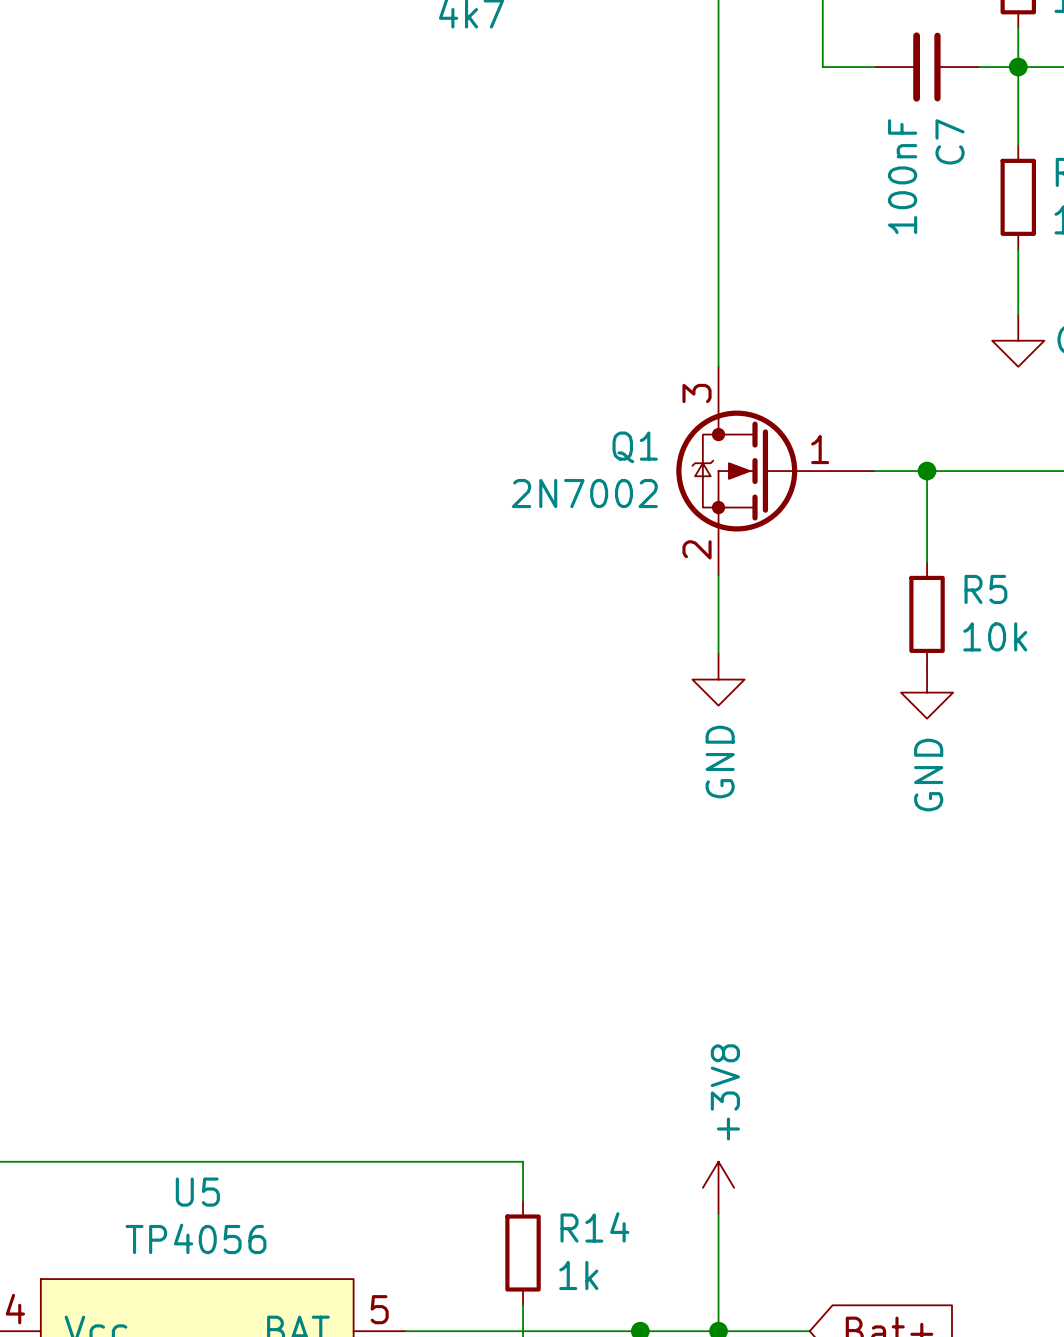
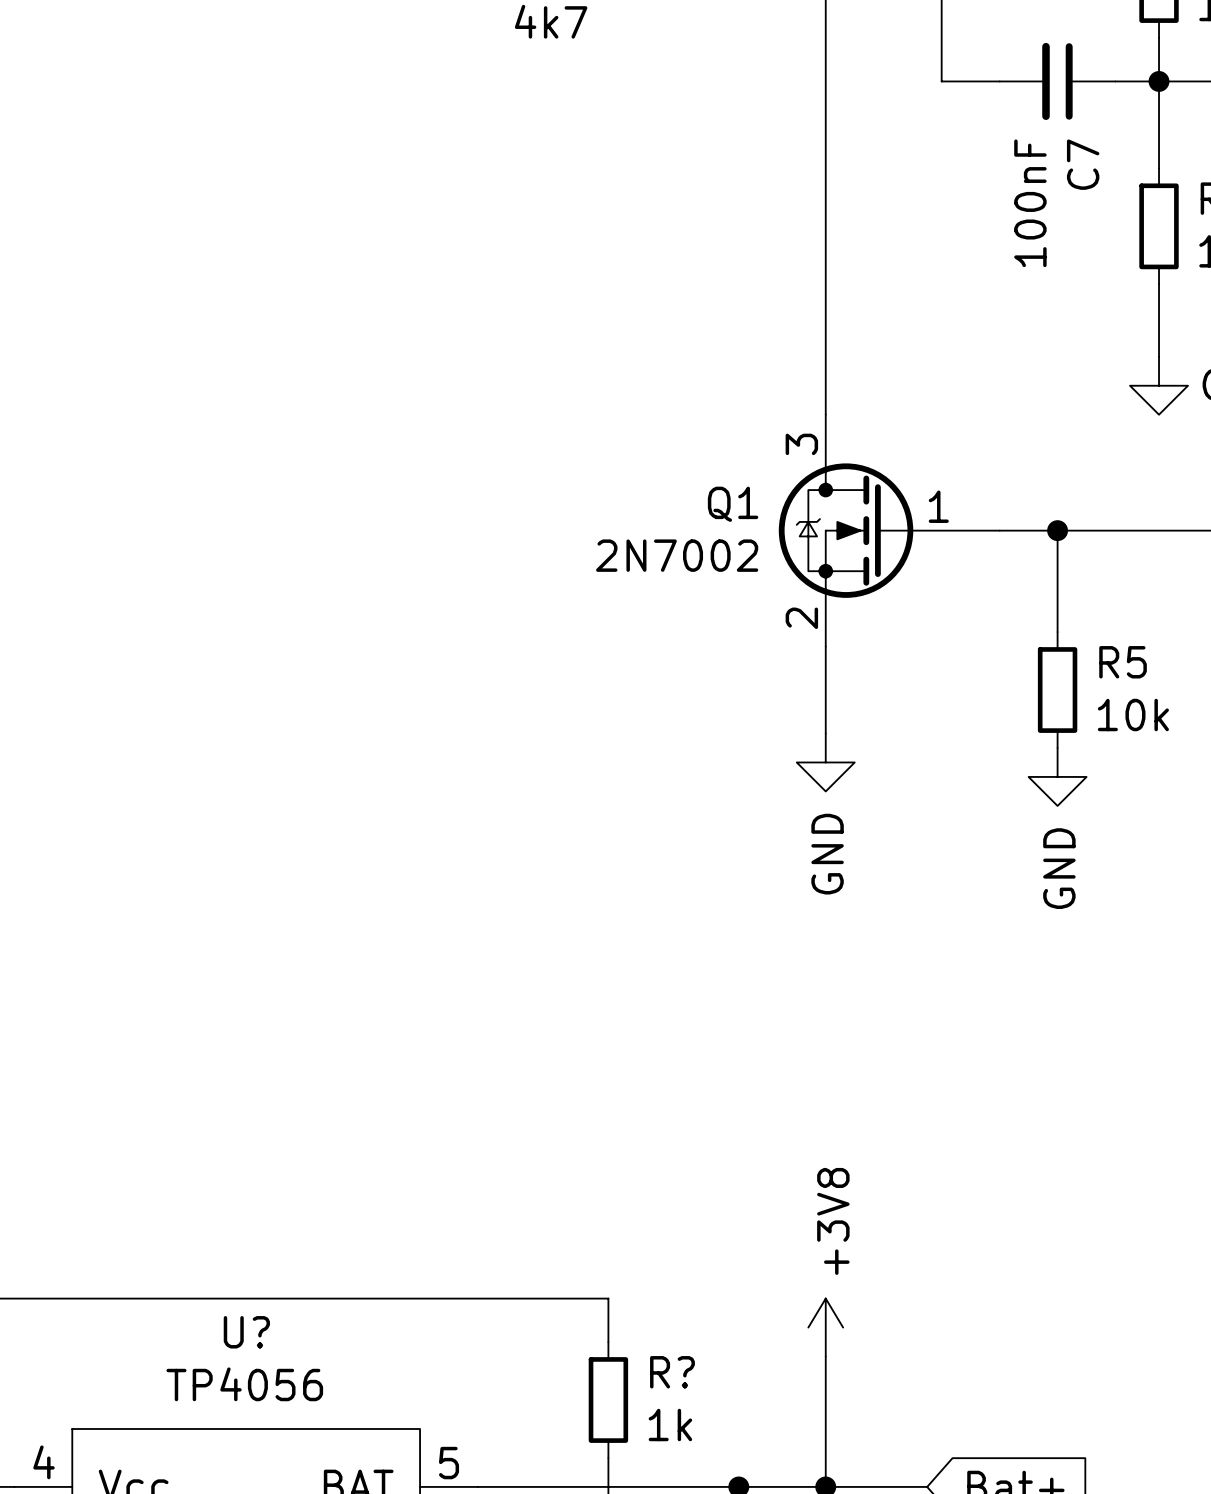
U5 name: U5 (197, 1192) -> U? (246, 1332)
R14 name: R14 (594, 1227) -> R? (672, 1372)

